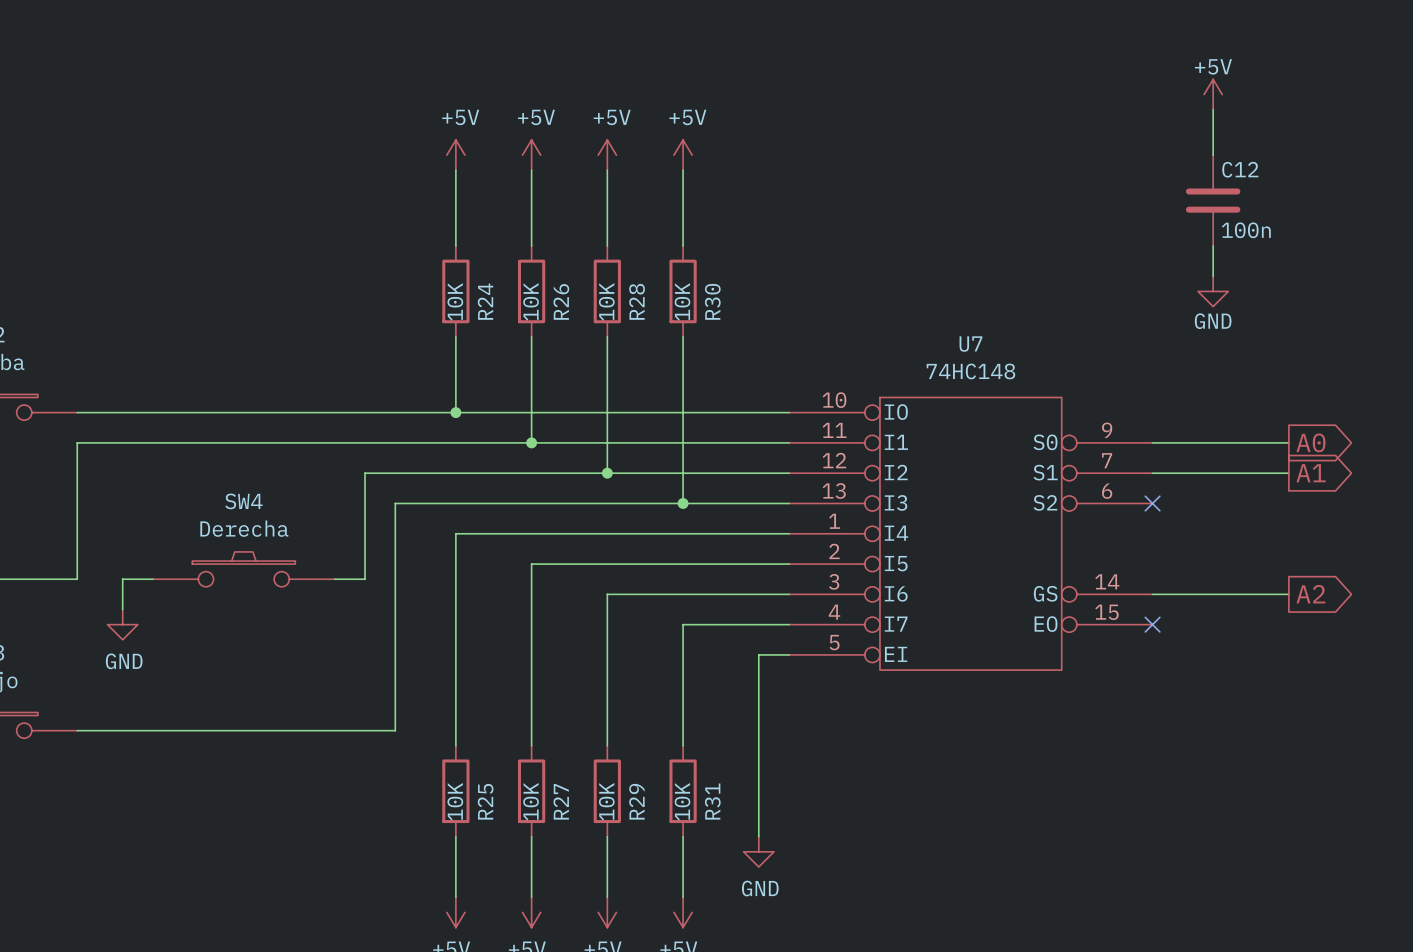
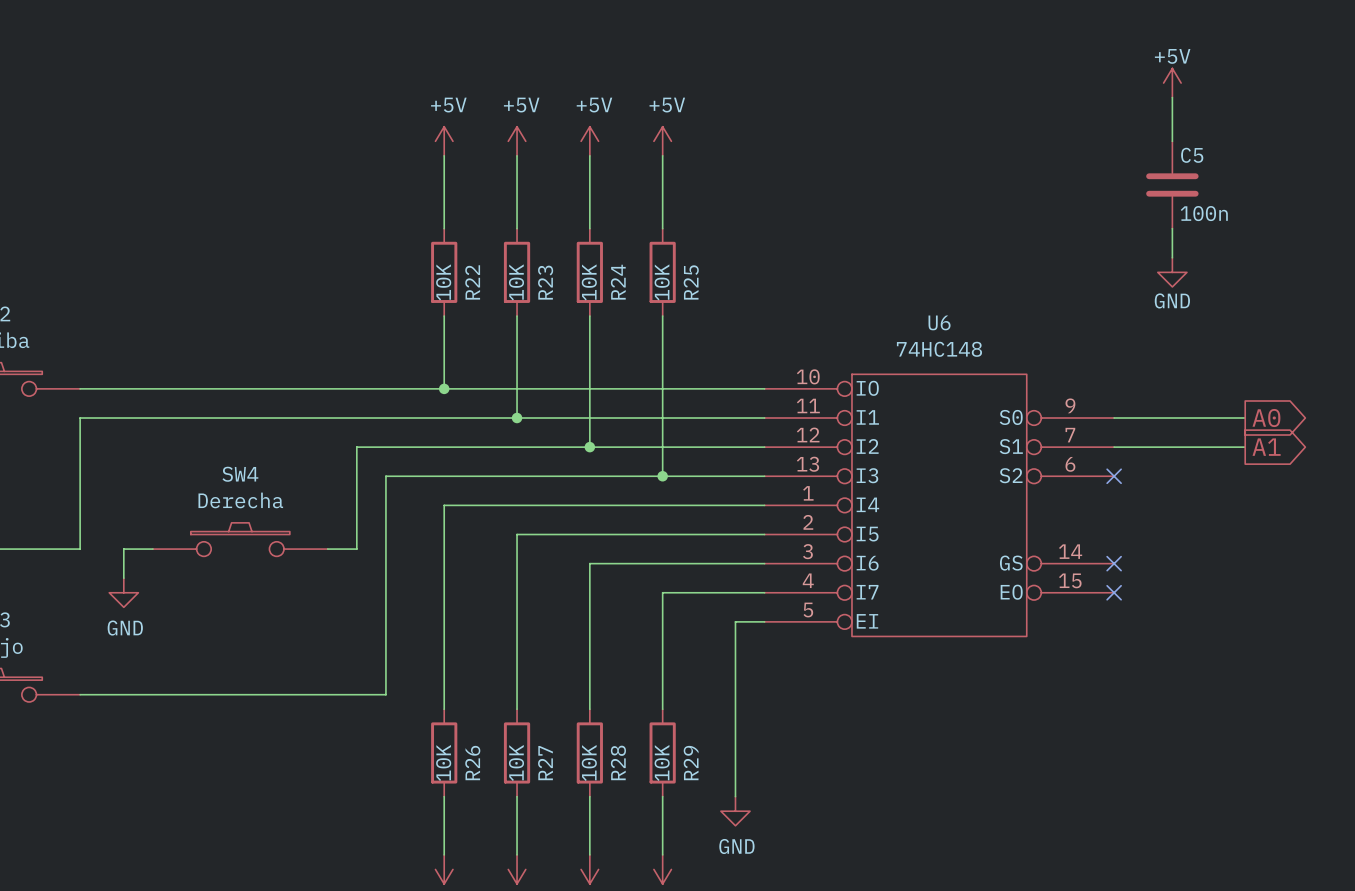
C12 name: C12 (1240, 169) -> C5 (1192, 155)
R24 name: R24 (485, 301) -> R22 (472, 282)
R26 name: R26 (561, 301) -> R23 (545, 282)
R28 name: R28 (637, 301) -> R24 (618, 282)
R30 name: R30 (712, 301) -> R25 (691, 282)
U7 name: U7 (970, 344) -> U6 (939, 322)
wire: (1152, 594) (1288, 594) -> none
no-connect mark: none -> (1114, 563)
global label: A2 (1310, 594) -> none
R25 name: R25 (485, 801) -> R26 (472, 763)
R29 name: R29 (636, 801) -> R28 (618, 762)
R31 name: R31 (712, 801) -> R29 (691, 763)

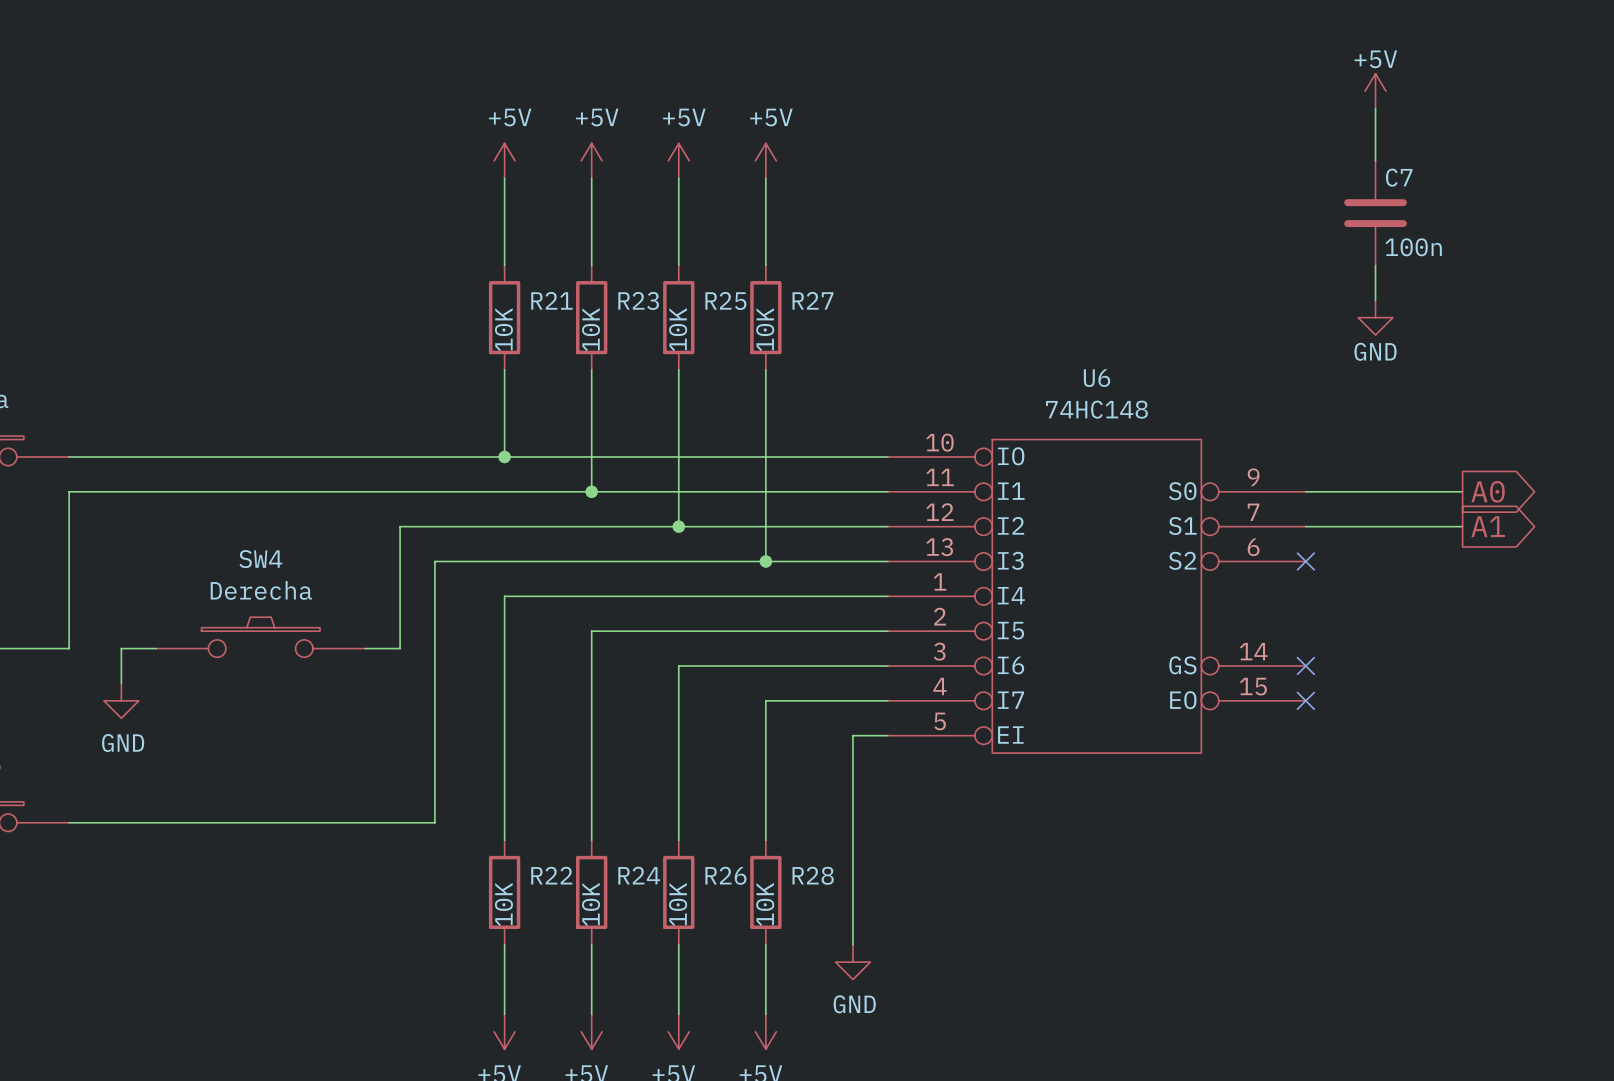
C5 name: C5 (1192, 155) -> C7 (1399, 177)
R22 name: R22 (472, 282) -> R21 (551, 300)
R23 name rotation: 0° (545, 282) -> 90° clockwise (638, 300)
R24 name: R24 (618, 282) -> R25 (725, 300)
R25 name: R25 (691, 282) -> R27 (812, 300)
R28 name: R28 (618, 762) -> R26 (725, 875)
R26 name: R26 (472, 763) -> R22 (551, 875)
R27 name: R27 (545, 763) -> R24 (639, 875)
R29 name: R29 (691, 763) -> R28 (813, 875)

